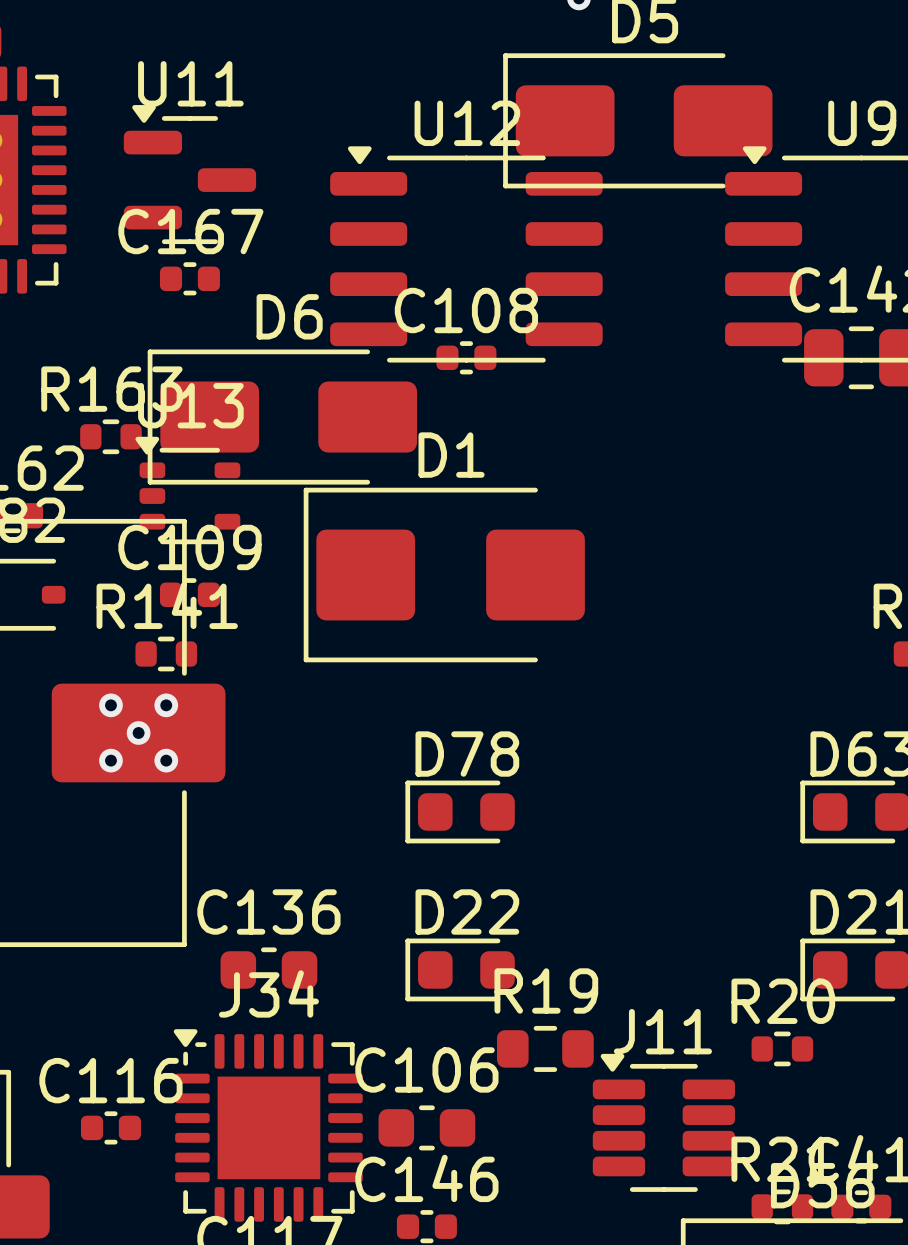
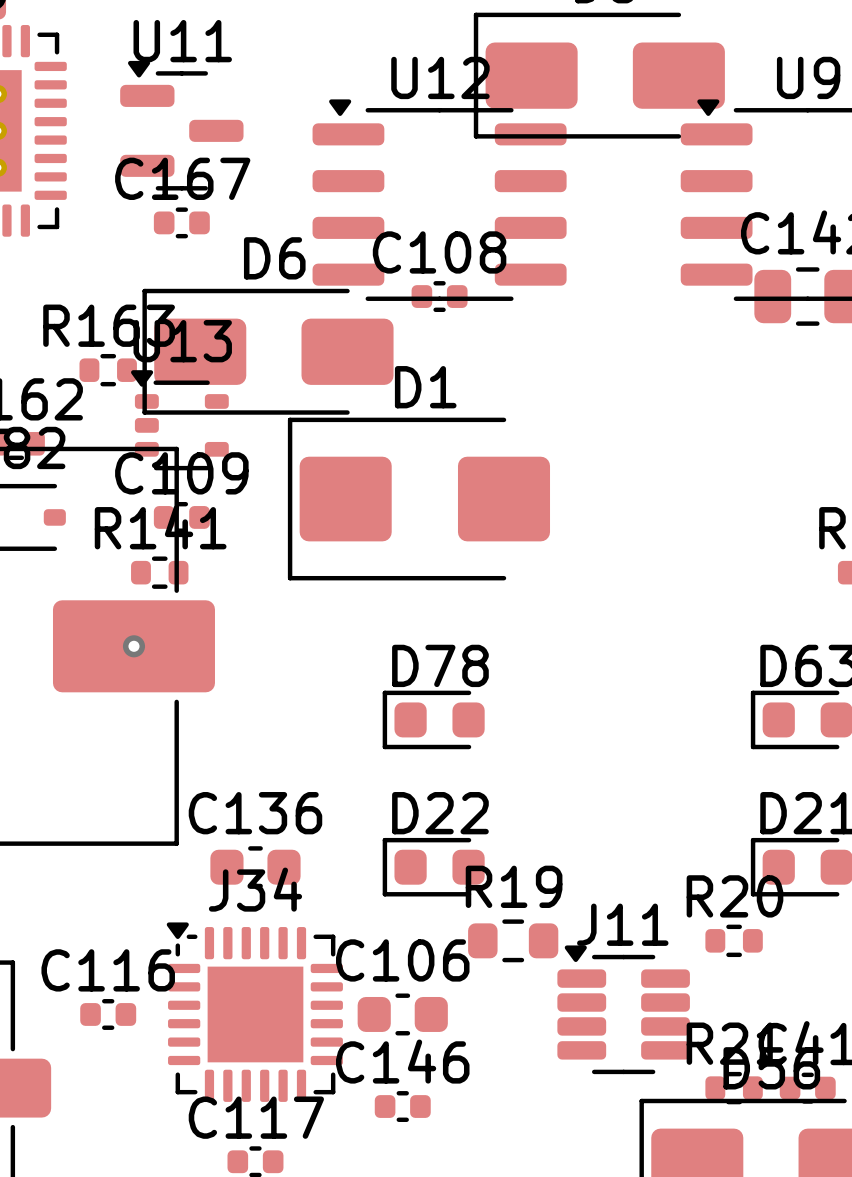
via: (110, 705) -> none
via: (166, 705) -> none
via: (110, 760) -> none
via: (166, 760) -> none

